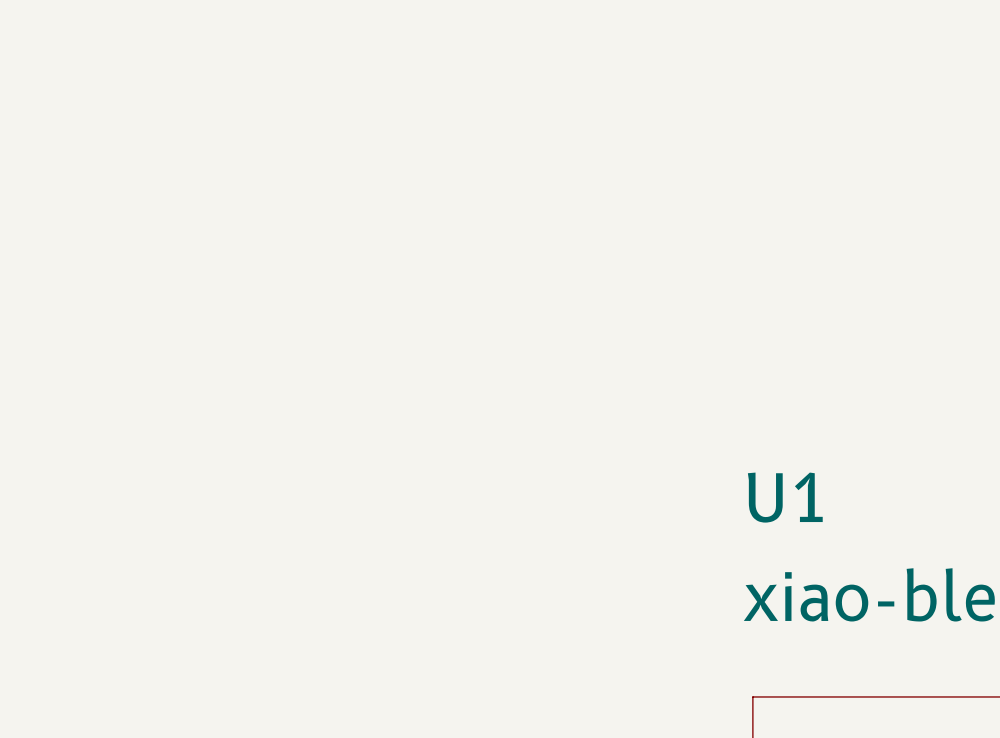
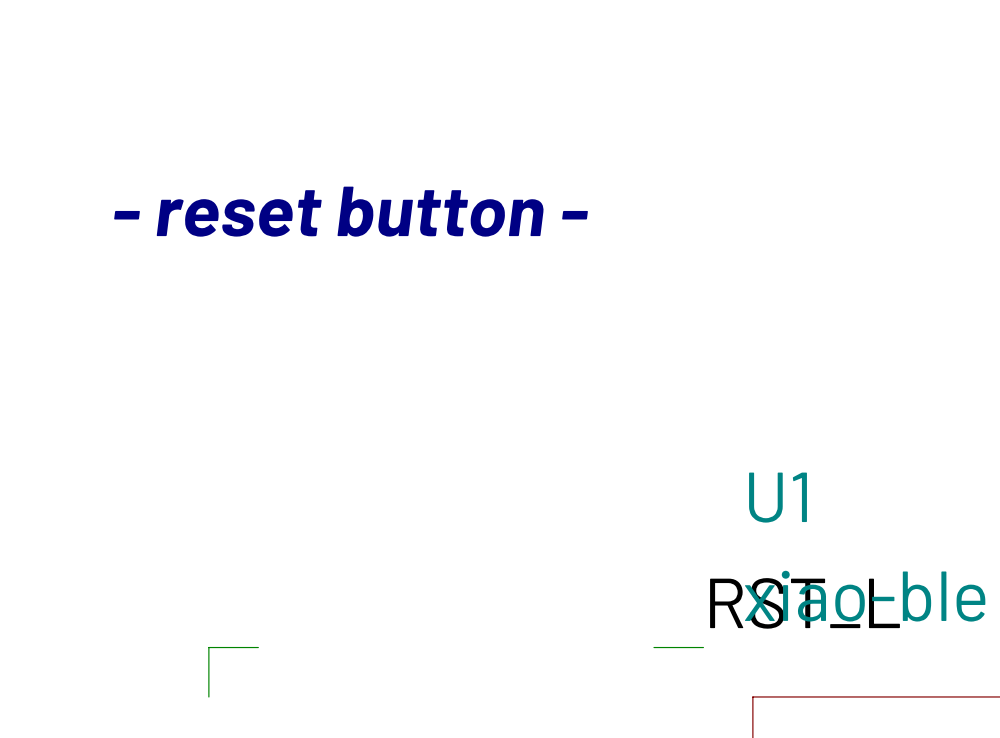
text: none -> - reset button - (351, 211)
label: none -> RST_L (805, 603)
wire: none -> (258, 647) (208, 647) (208, 696)
wire: none -> (653, 647) (703, 647)

